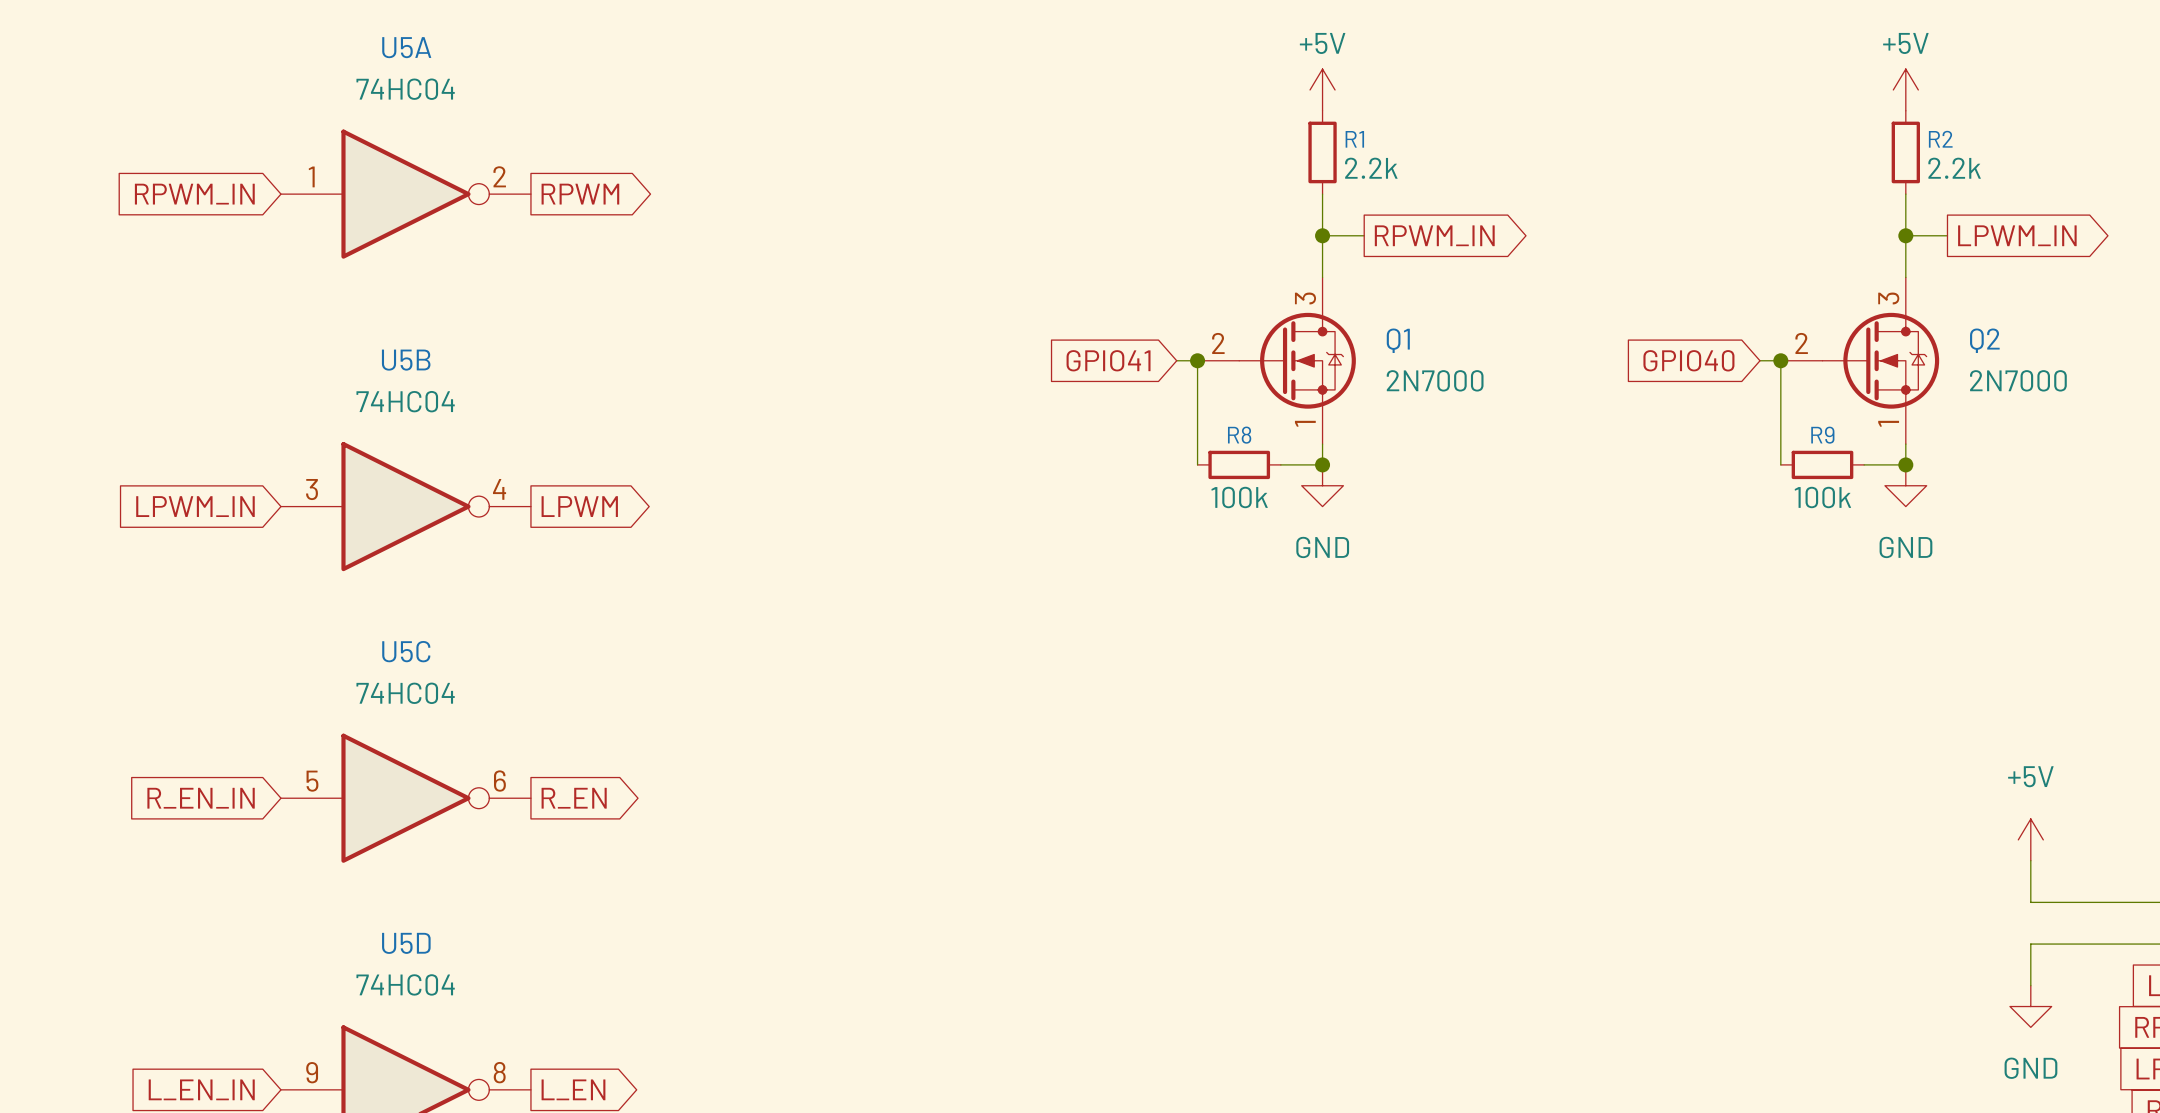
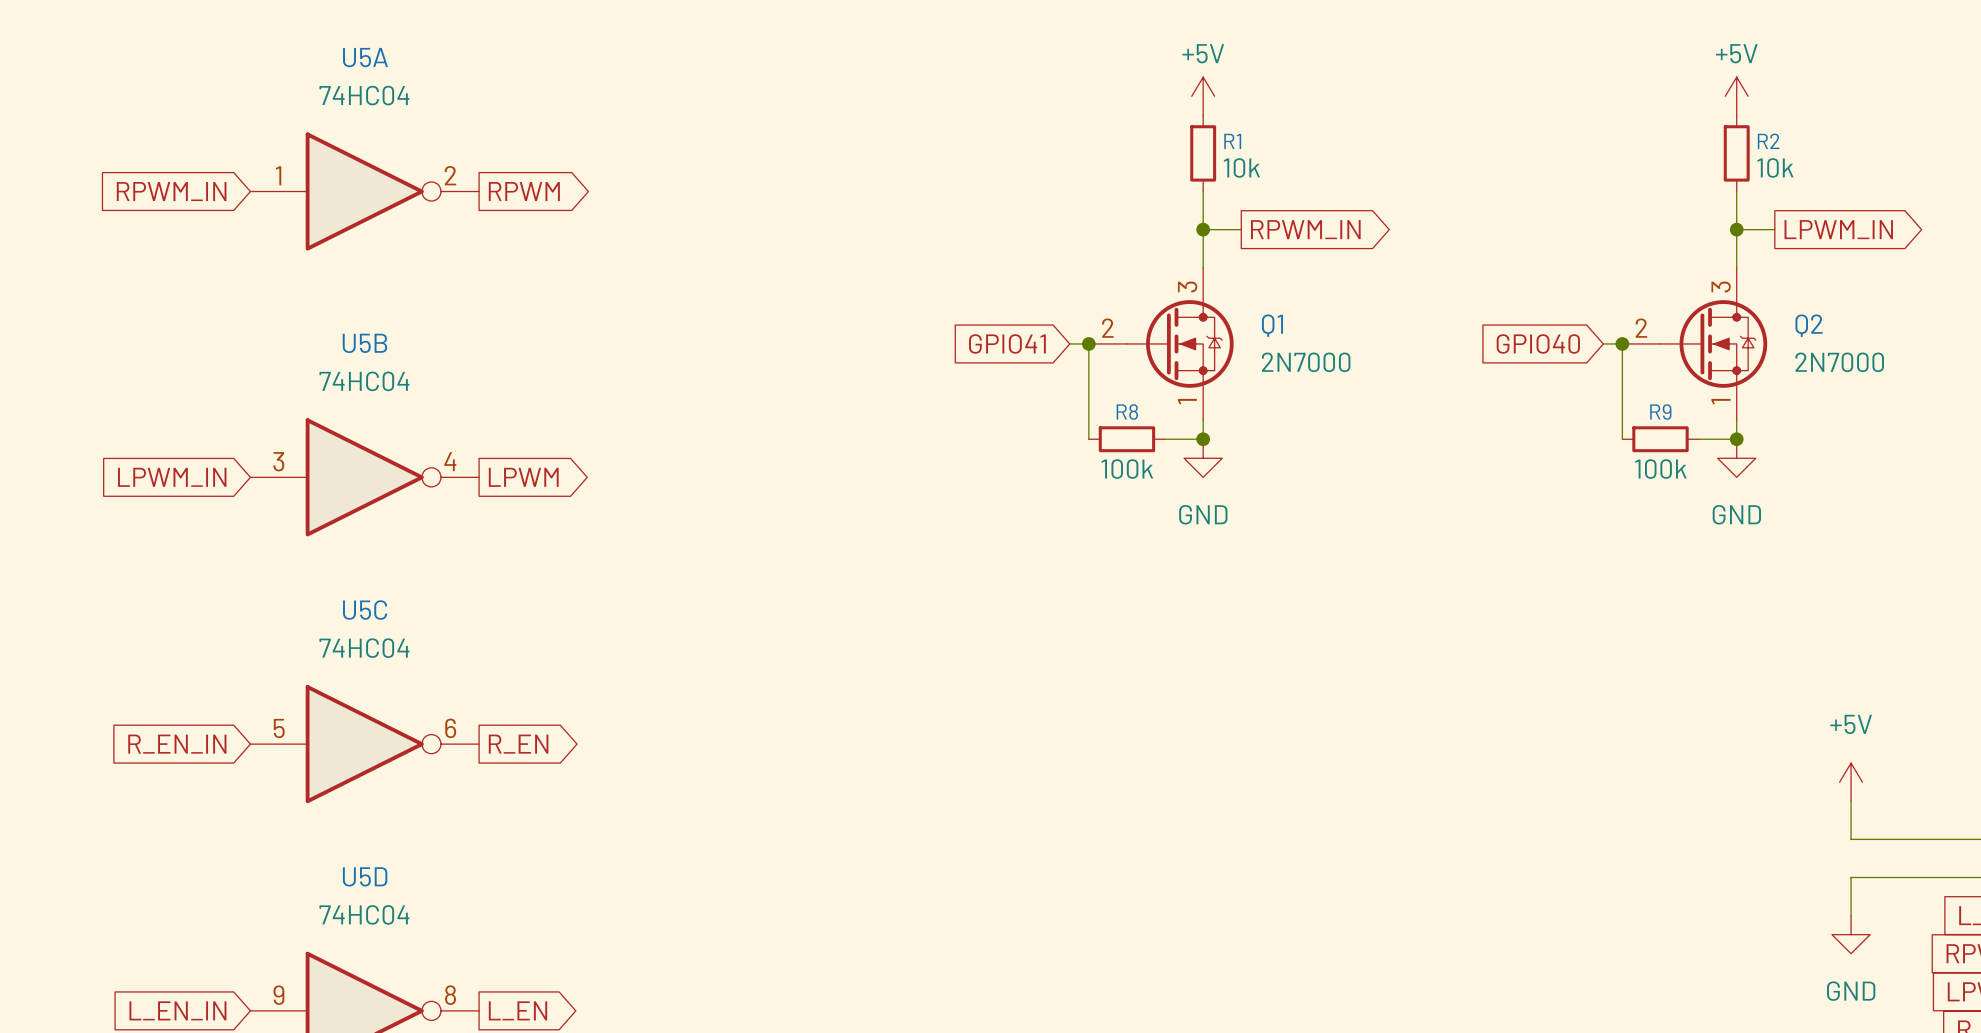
R1 value: 2.2k (1371, 168) -> 10k (1241, 167)
R2 value: 2.2k (1954, 168) -> 10k (1775, 167)

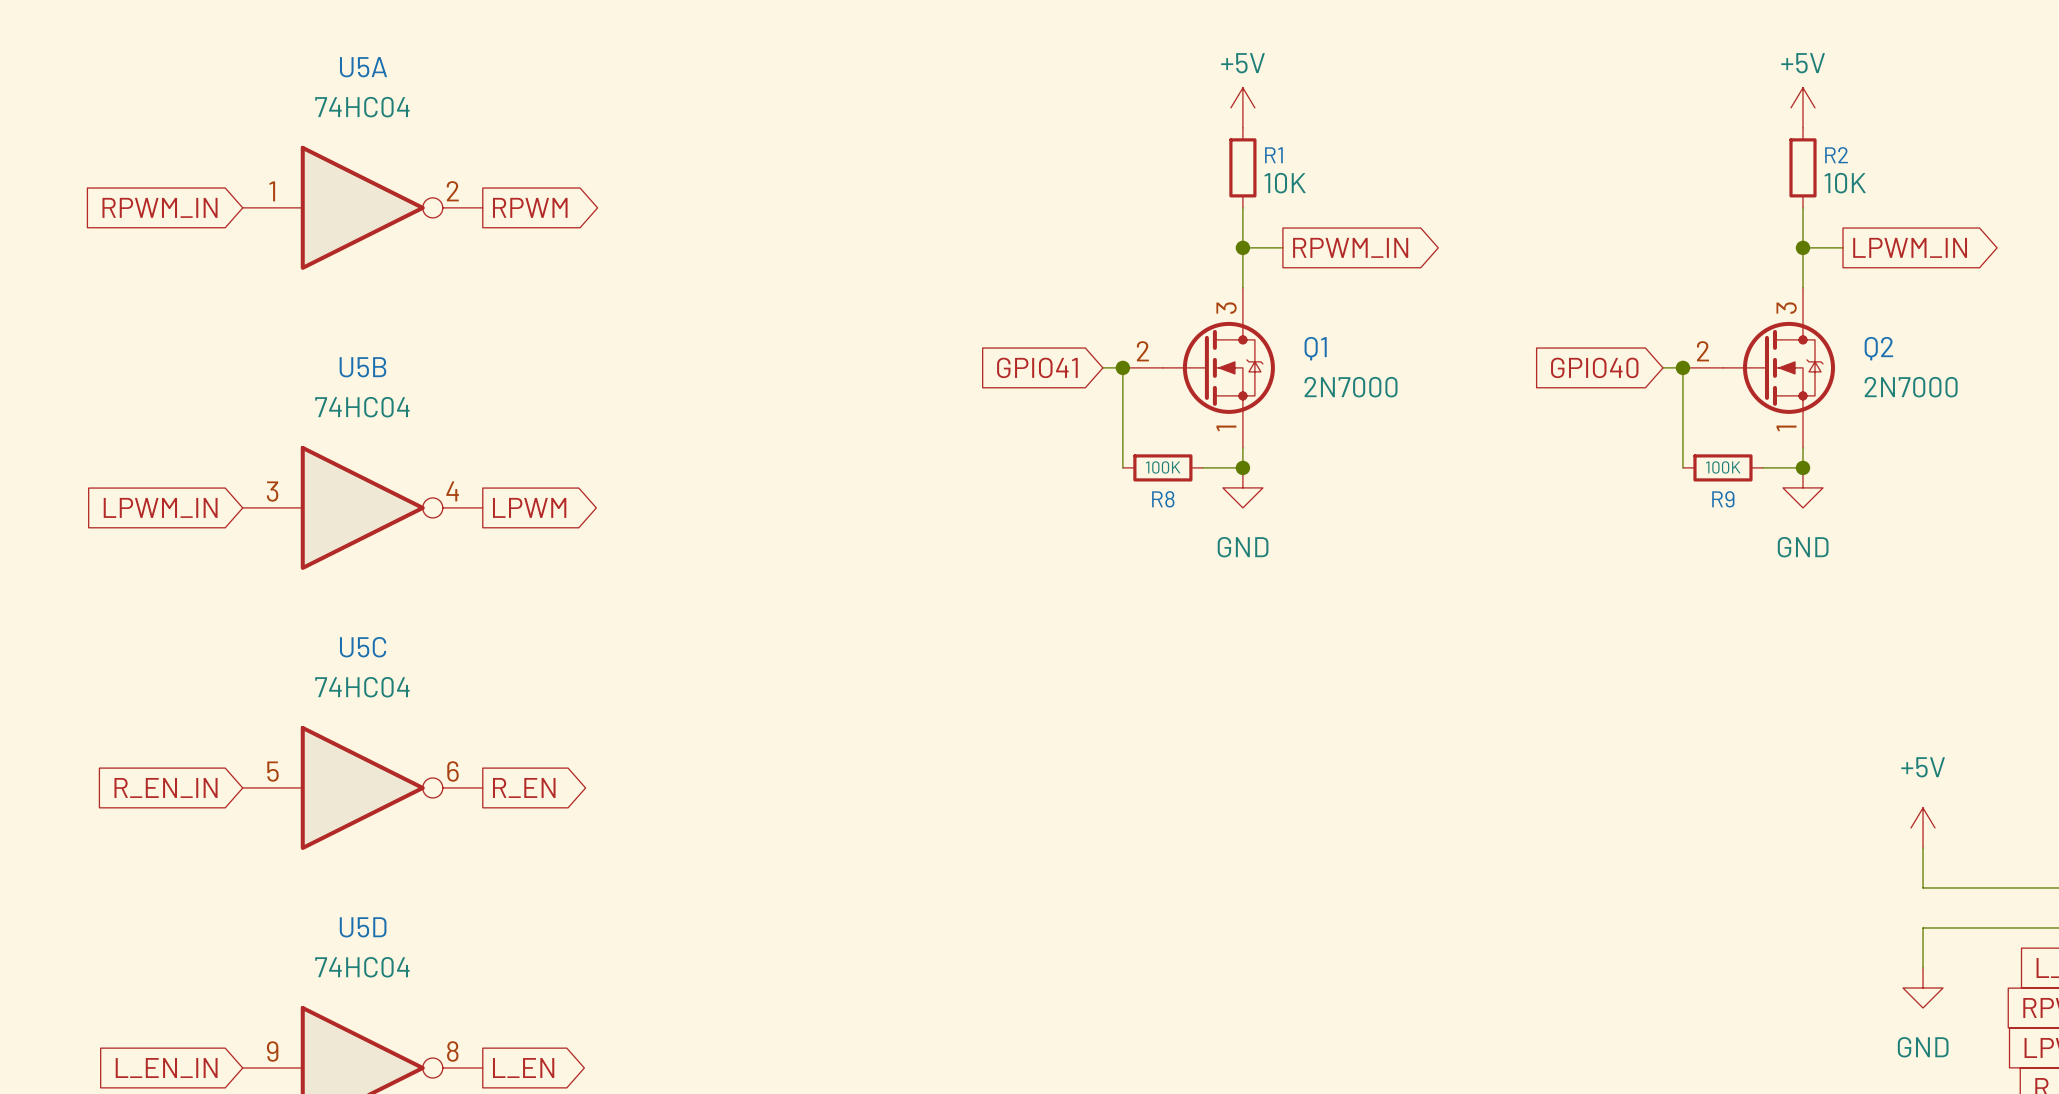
R1 value: 10k (1241, 167) -> 10K (1285, 183)
R2 value: 10k (1775, 167) -> 10K (1845, 183)
R8 name position: R8 (1127, 411) -> R8 (1163, 499)
R9 name position: R9 (1660, 412) -> R9 (1723, 499)
R8 value: 100k (1127, 469) -> 100K (1163, 467)
R9 value: 100k (1660, 469) -> 100K (1723, 467)

